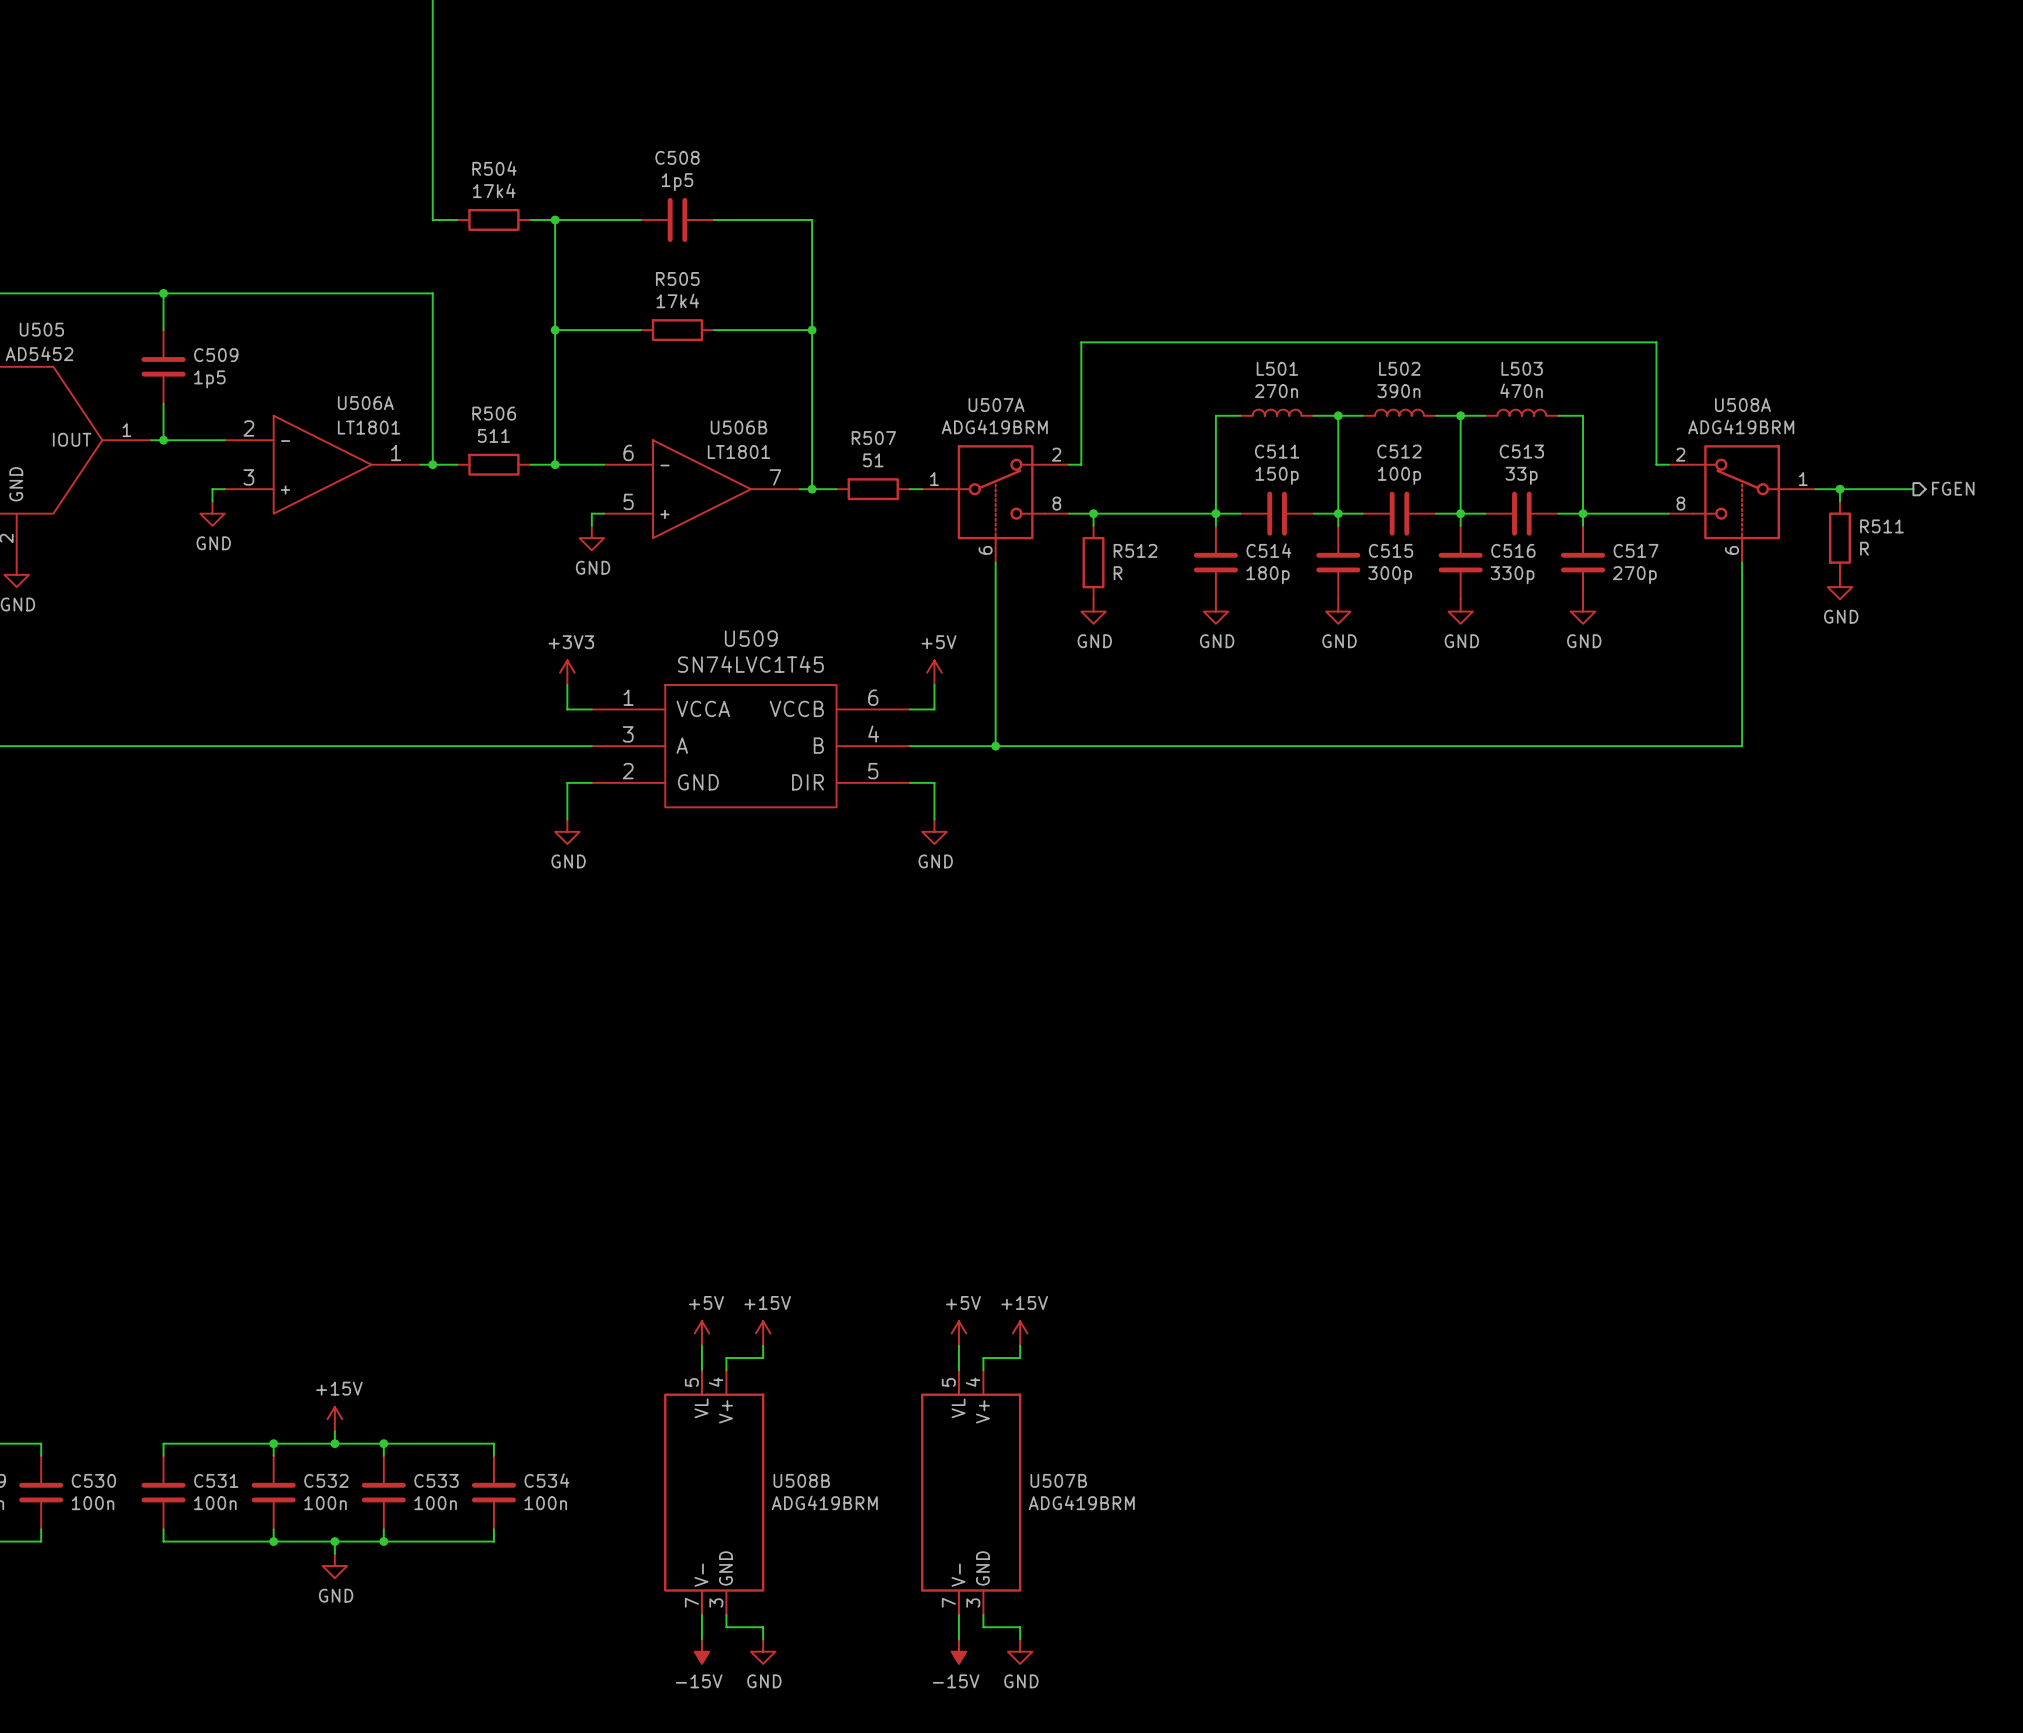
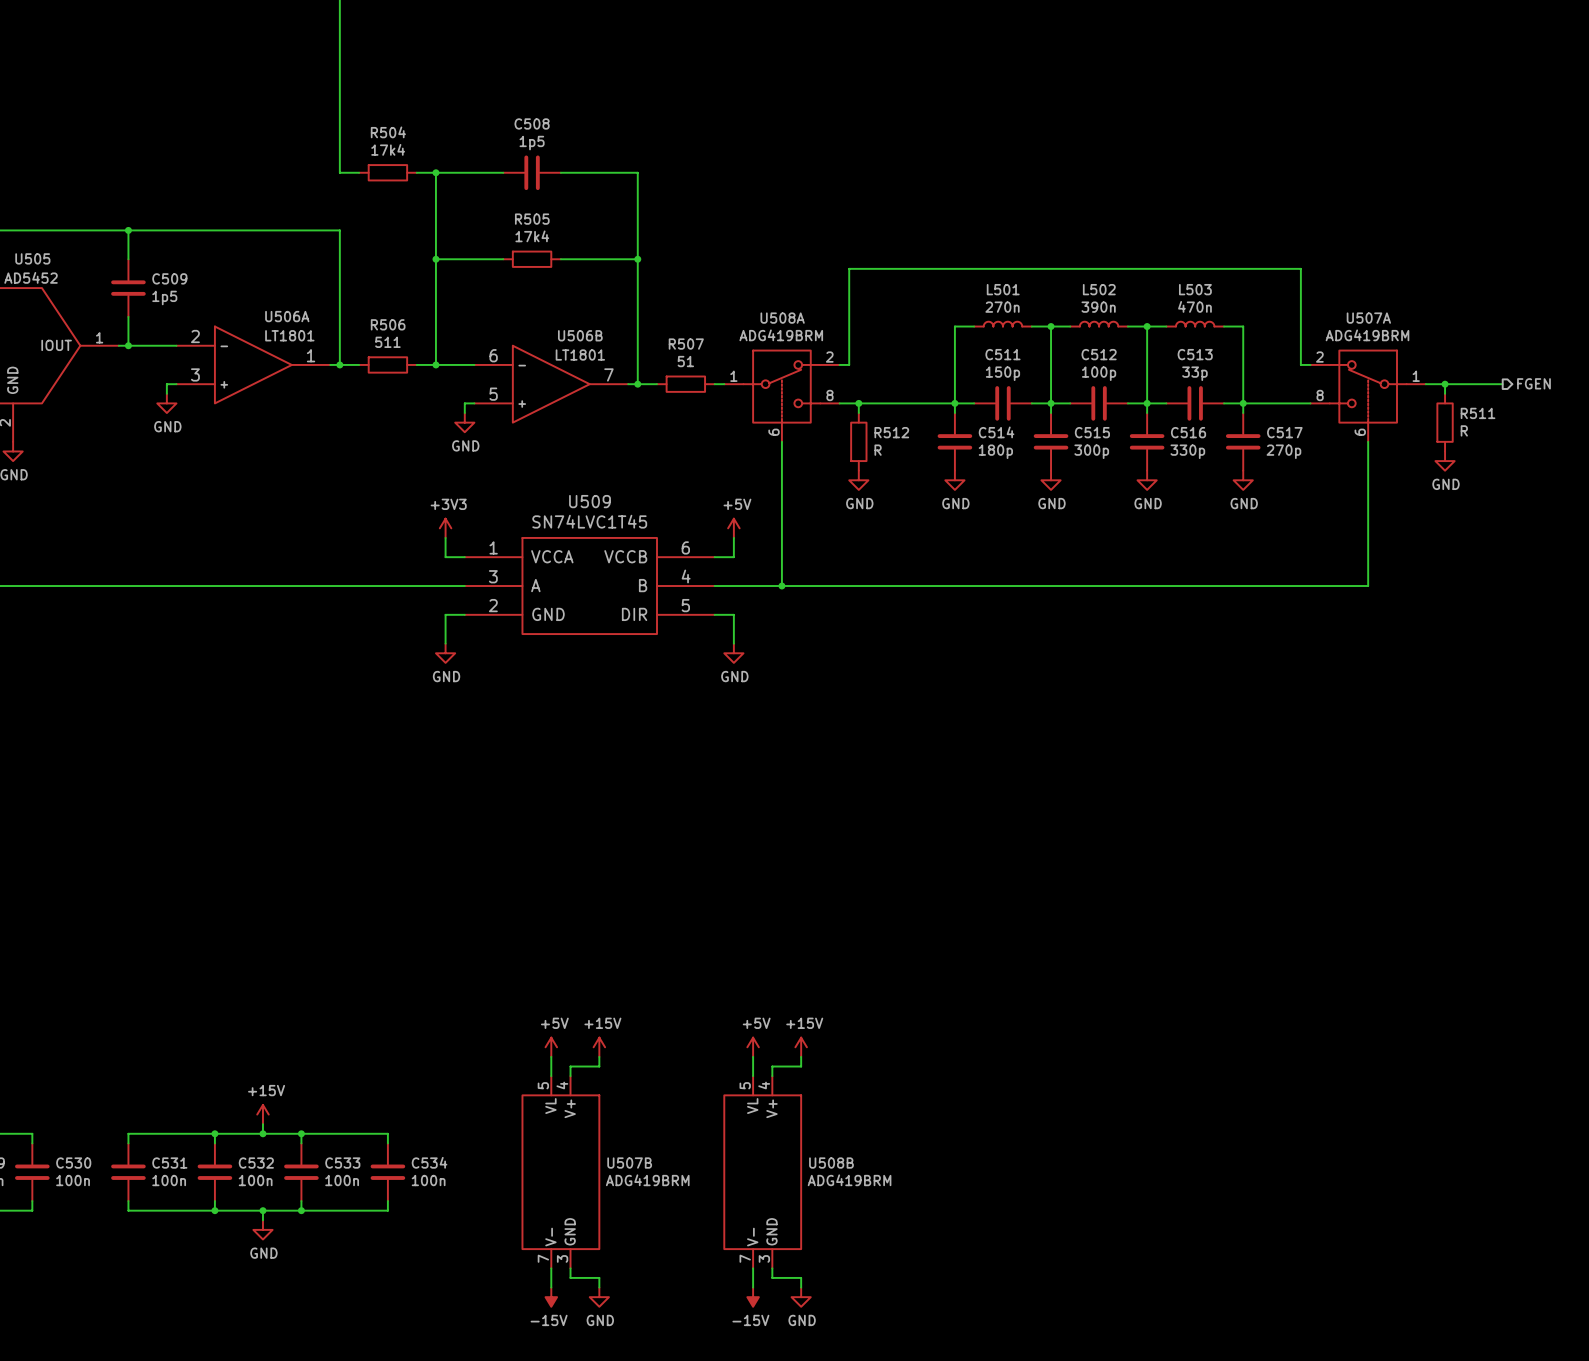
U507A name: U507A (996, 405) -> U508A (782, 318)
U508A name: U508A (1742, 405) -> U507A (1368, 318)
U508B name: U508B (801, 1480) -> U507B (629, 1163)
U507B name: U507B (1058, 1480) -> U508B (831, 1163)

